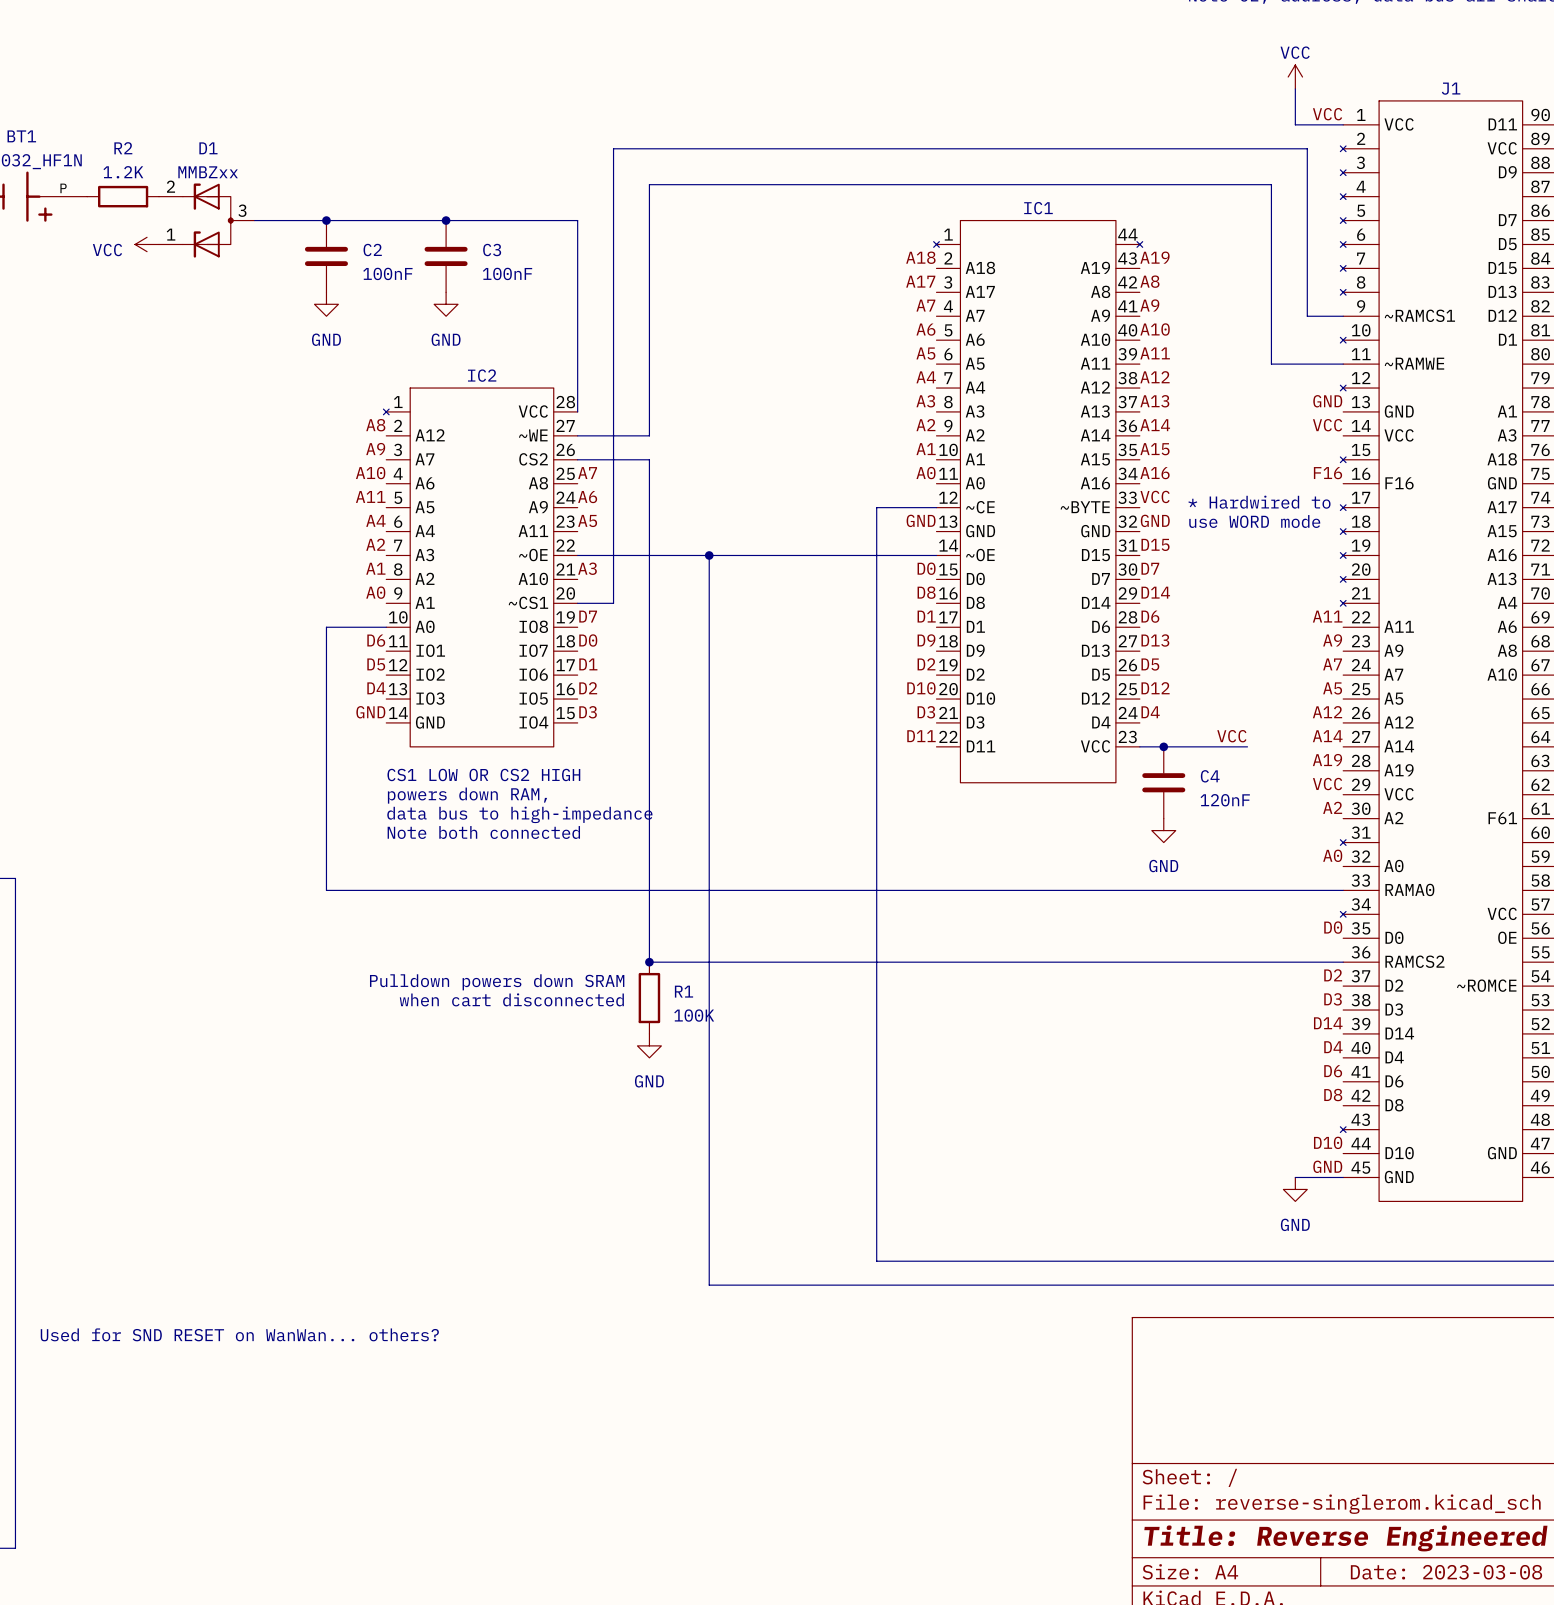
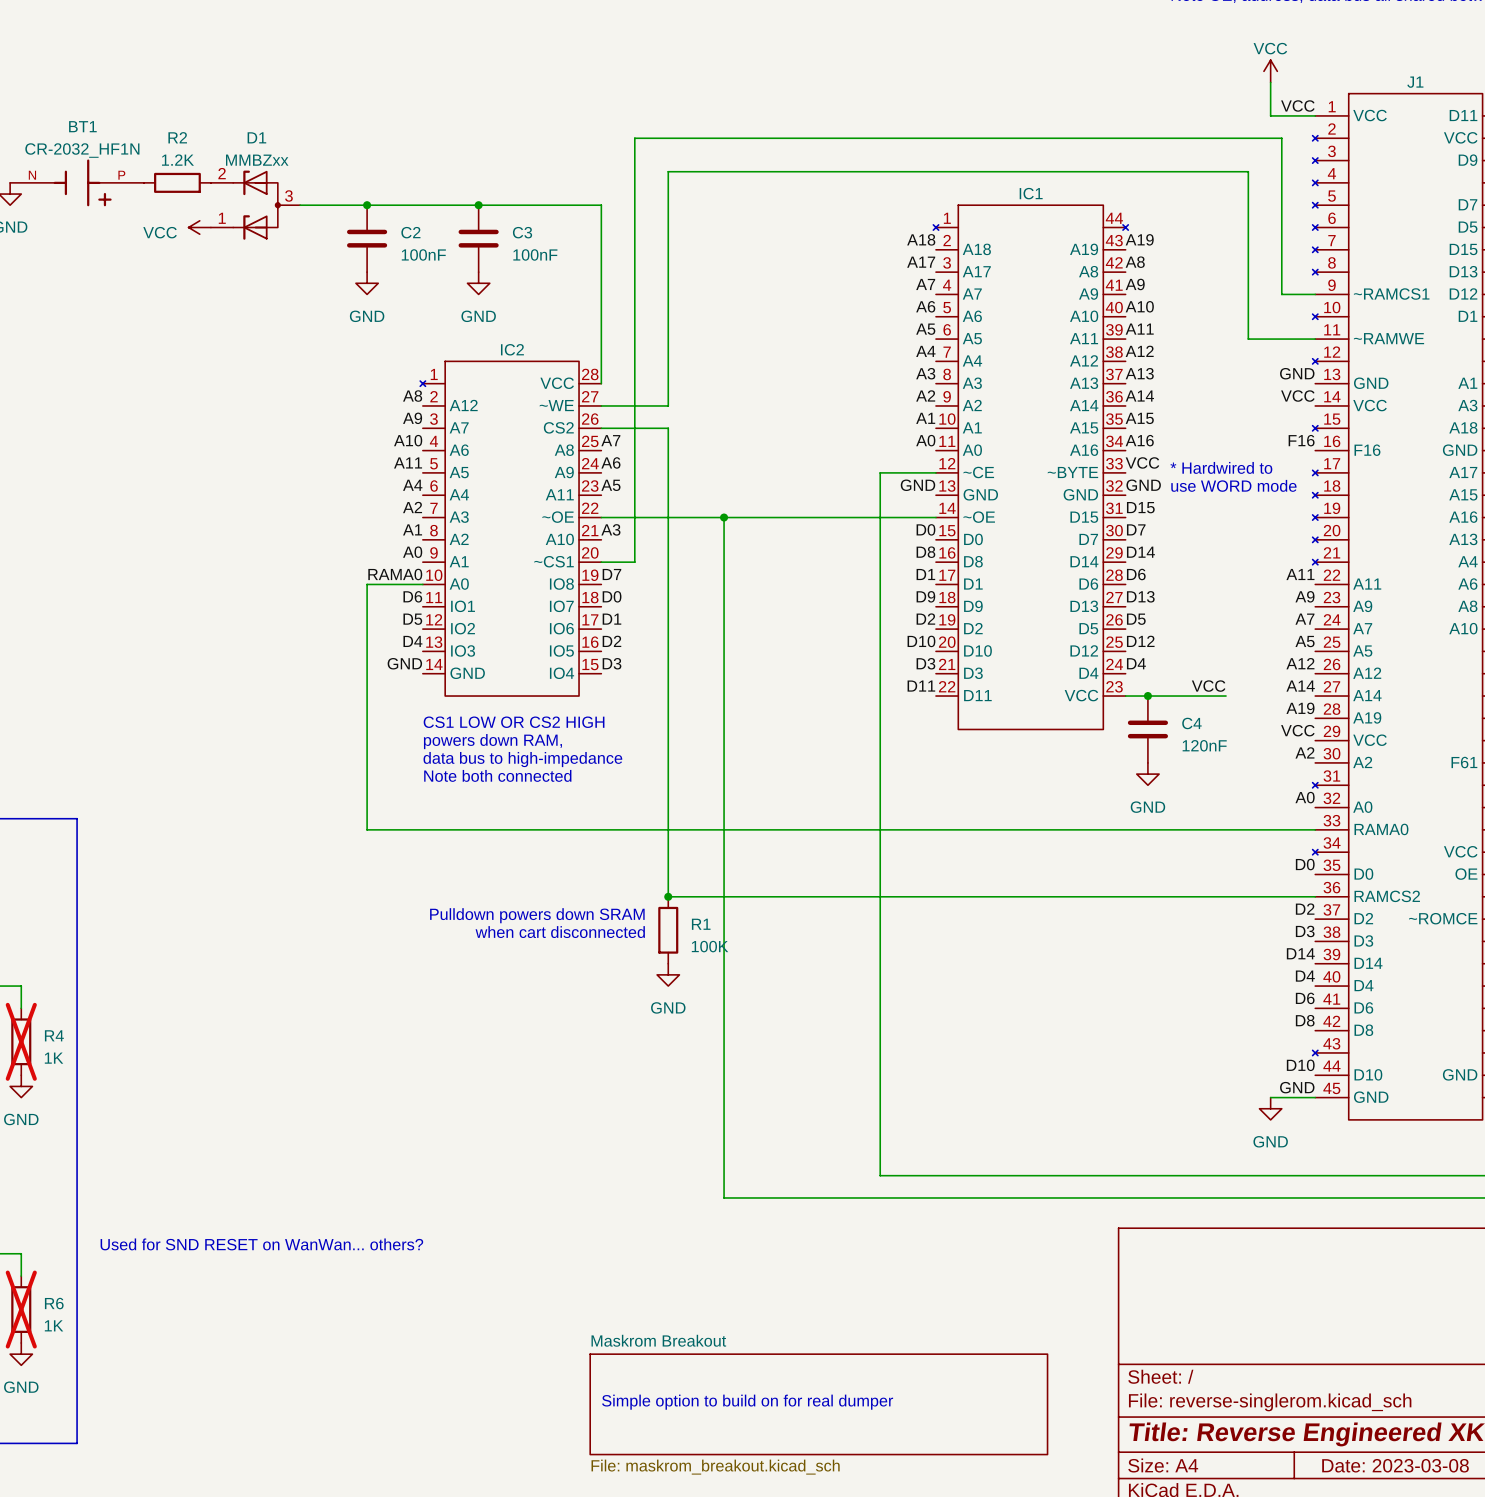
label: none -> RAMA0 (395, 574)
text: none -> Simple option to build on for real dumper (747, 1402)
sheet Maskrom Breakout: none -> File: maskrom_breakout.kicad_sch (818, 1404)

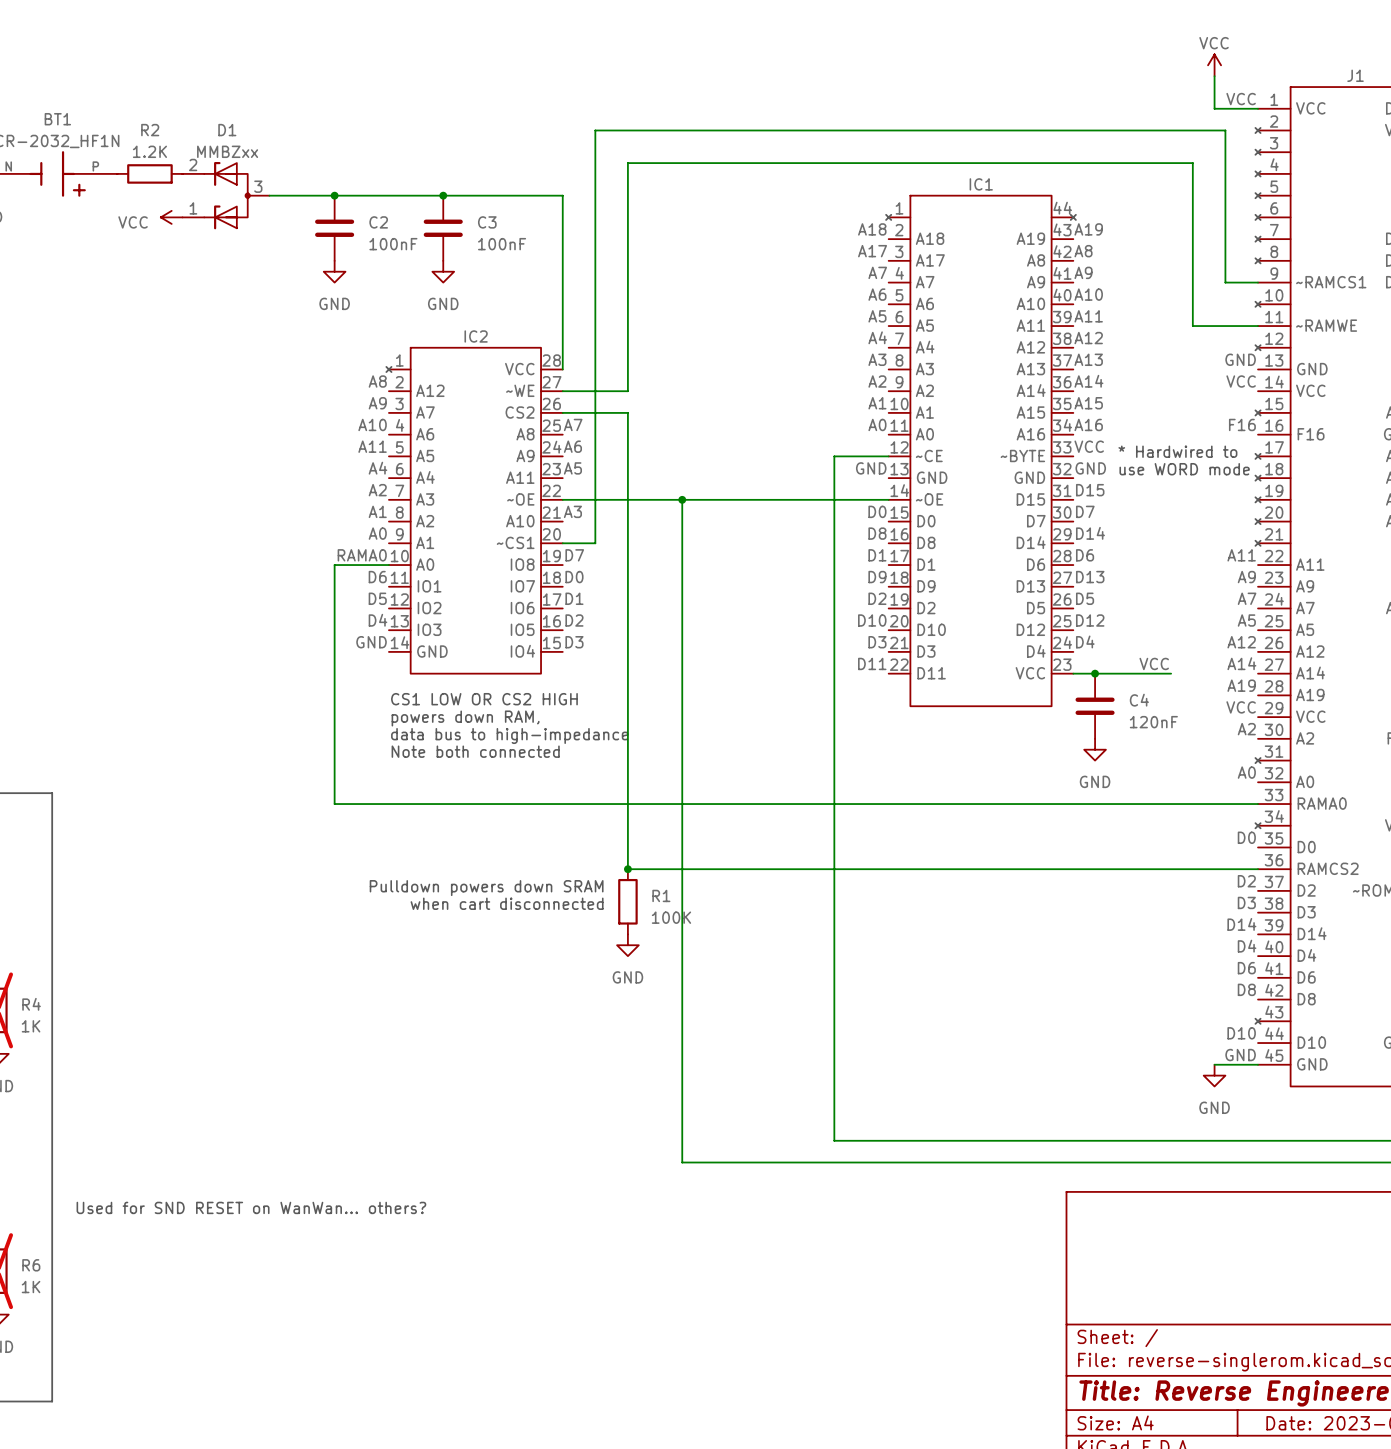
text: Simple option to build on for real dumper (747, 1402) -> none
sheet Maskrom Breakout: File: maskrom_breakout.kicad_sch (818, 1404) -> none

